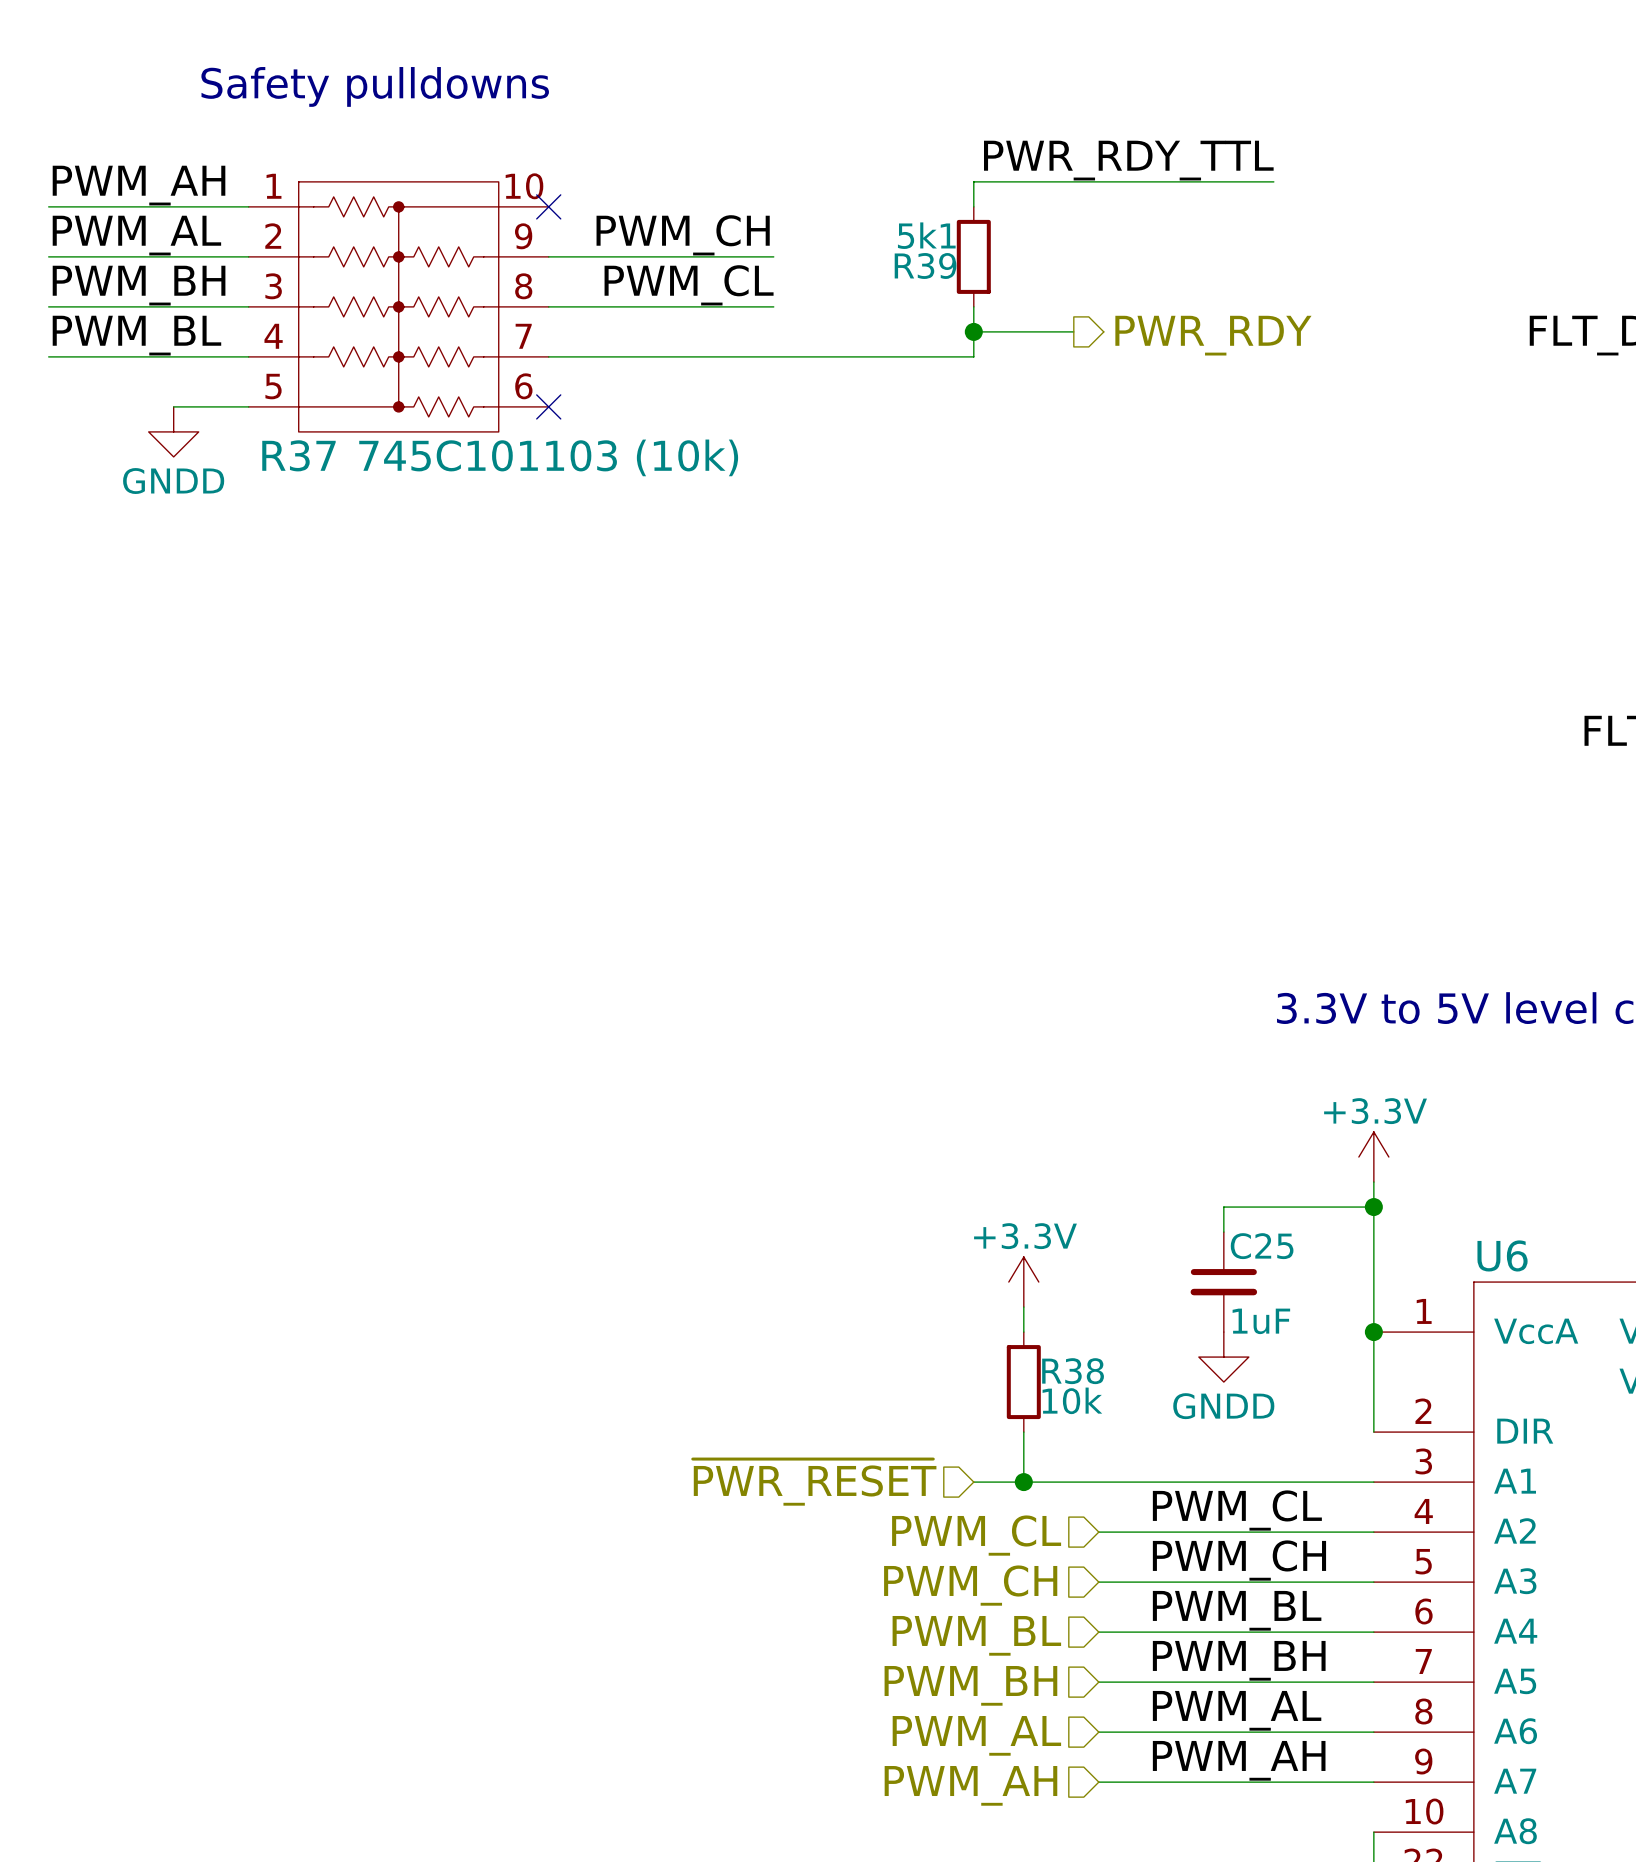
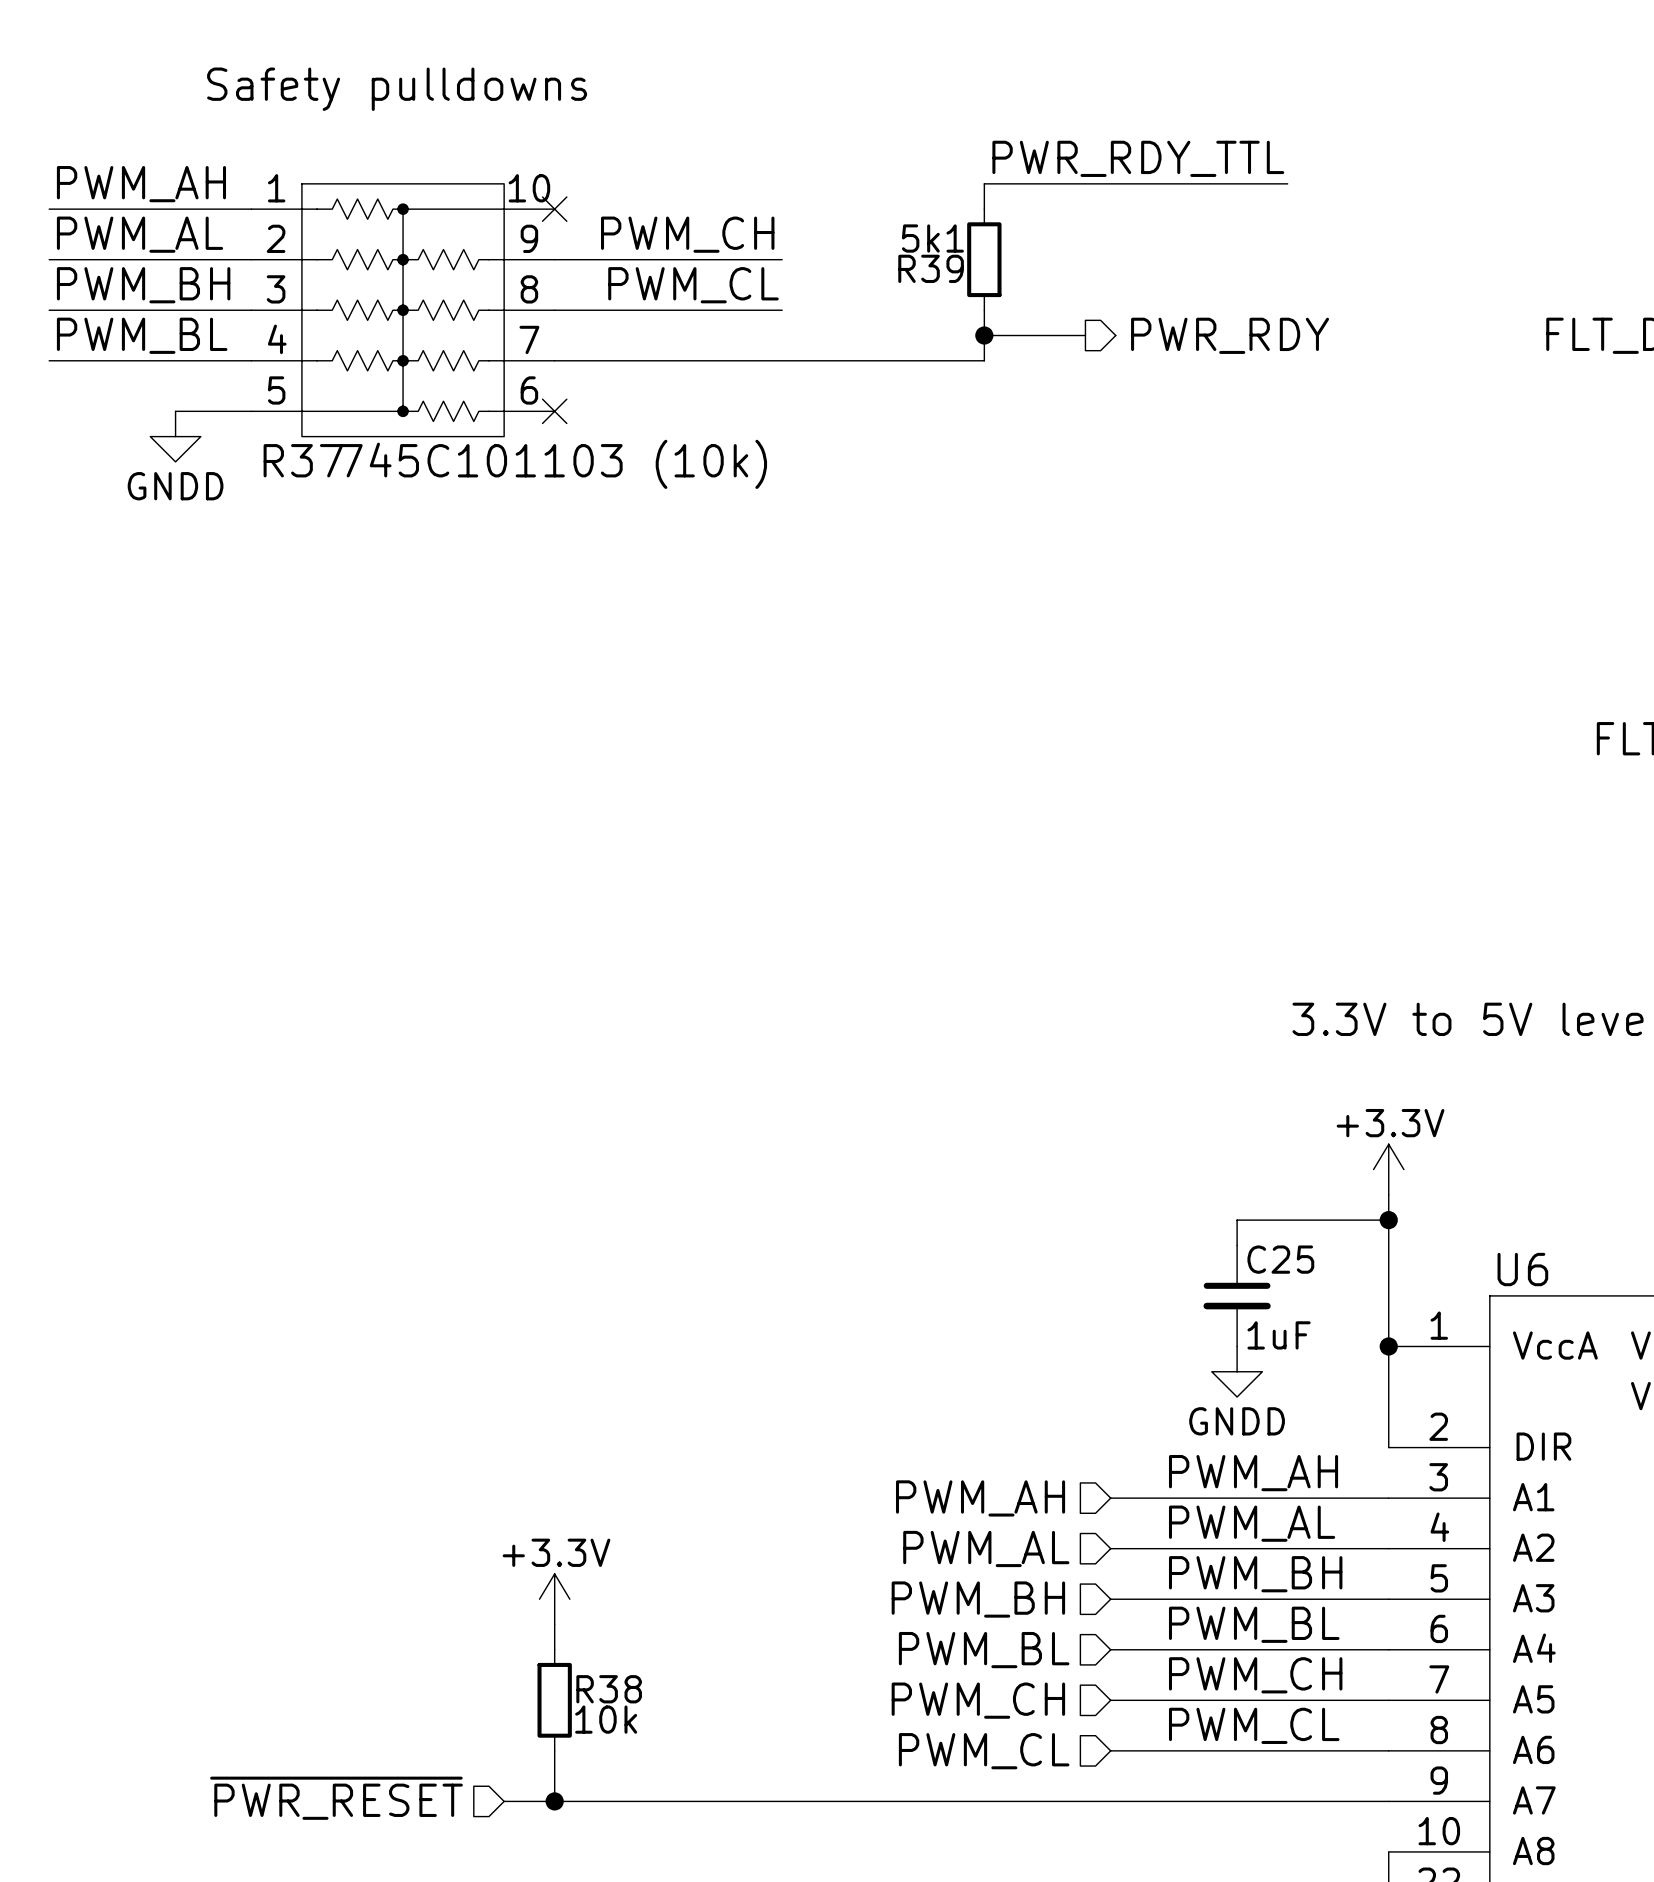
power symbol: +3.3V (1023, 1282) -> none
wire: (1023, 1307) (1023, 1332) -> none
R38 position: (1023, 1382) -> (554, 1700)
wire: (1023, 1432) (1023, 1482) -> none
hierarchical label: ~{PWR_RESET} (814, 1482) -> none
wire: (973, 1482) (1098, 1482) -> none
junction: (1023, 1482) -> none
label: PWM_CL (1237, 1510) -> PWM_AL (1252, 1523)
hierarchical label: PWM_CL (976, 1535) -> PWM_AL (986, 1548)
label: PWM_CH (1239, 1560) -> PWM_BH (1255, 1574)
power symbol: none -> +3.3V (554, 1599)
hierarchical label: PWM_CH (970, 1585) -> PWM_BH (978, 1599)
wire: none -> (554, 1624) (554, 1649)
label: PWM_BH (1239, 1660) -> PWM_CH (1255, 1675)
hierarchical label: PWM_BH (970, 1685) -> PWM_CH (978, 1700)
label: PWM_AL (1237, 1710) -> PWM_CL (1254, 1725)
wire: none -> (554, 1750) (554, 1801)
hierarchical label: PWM_AL (976, 1735) -> PWM_CL (984, 1751)
label position: PWM_AH (1239, 1760) -> PWM_AH (1253, 1473)
hierarchical label: none -> ~{PWR_RESET} (336, 1798)
wire: none -> (504, 1801) (1110, 1801)
junction: none -> (554, 1801)
hierarchical label position: PWM_AH (970, 1785) -> PWM_AH (980, 1498)

